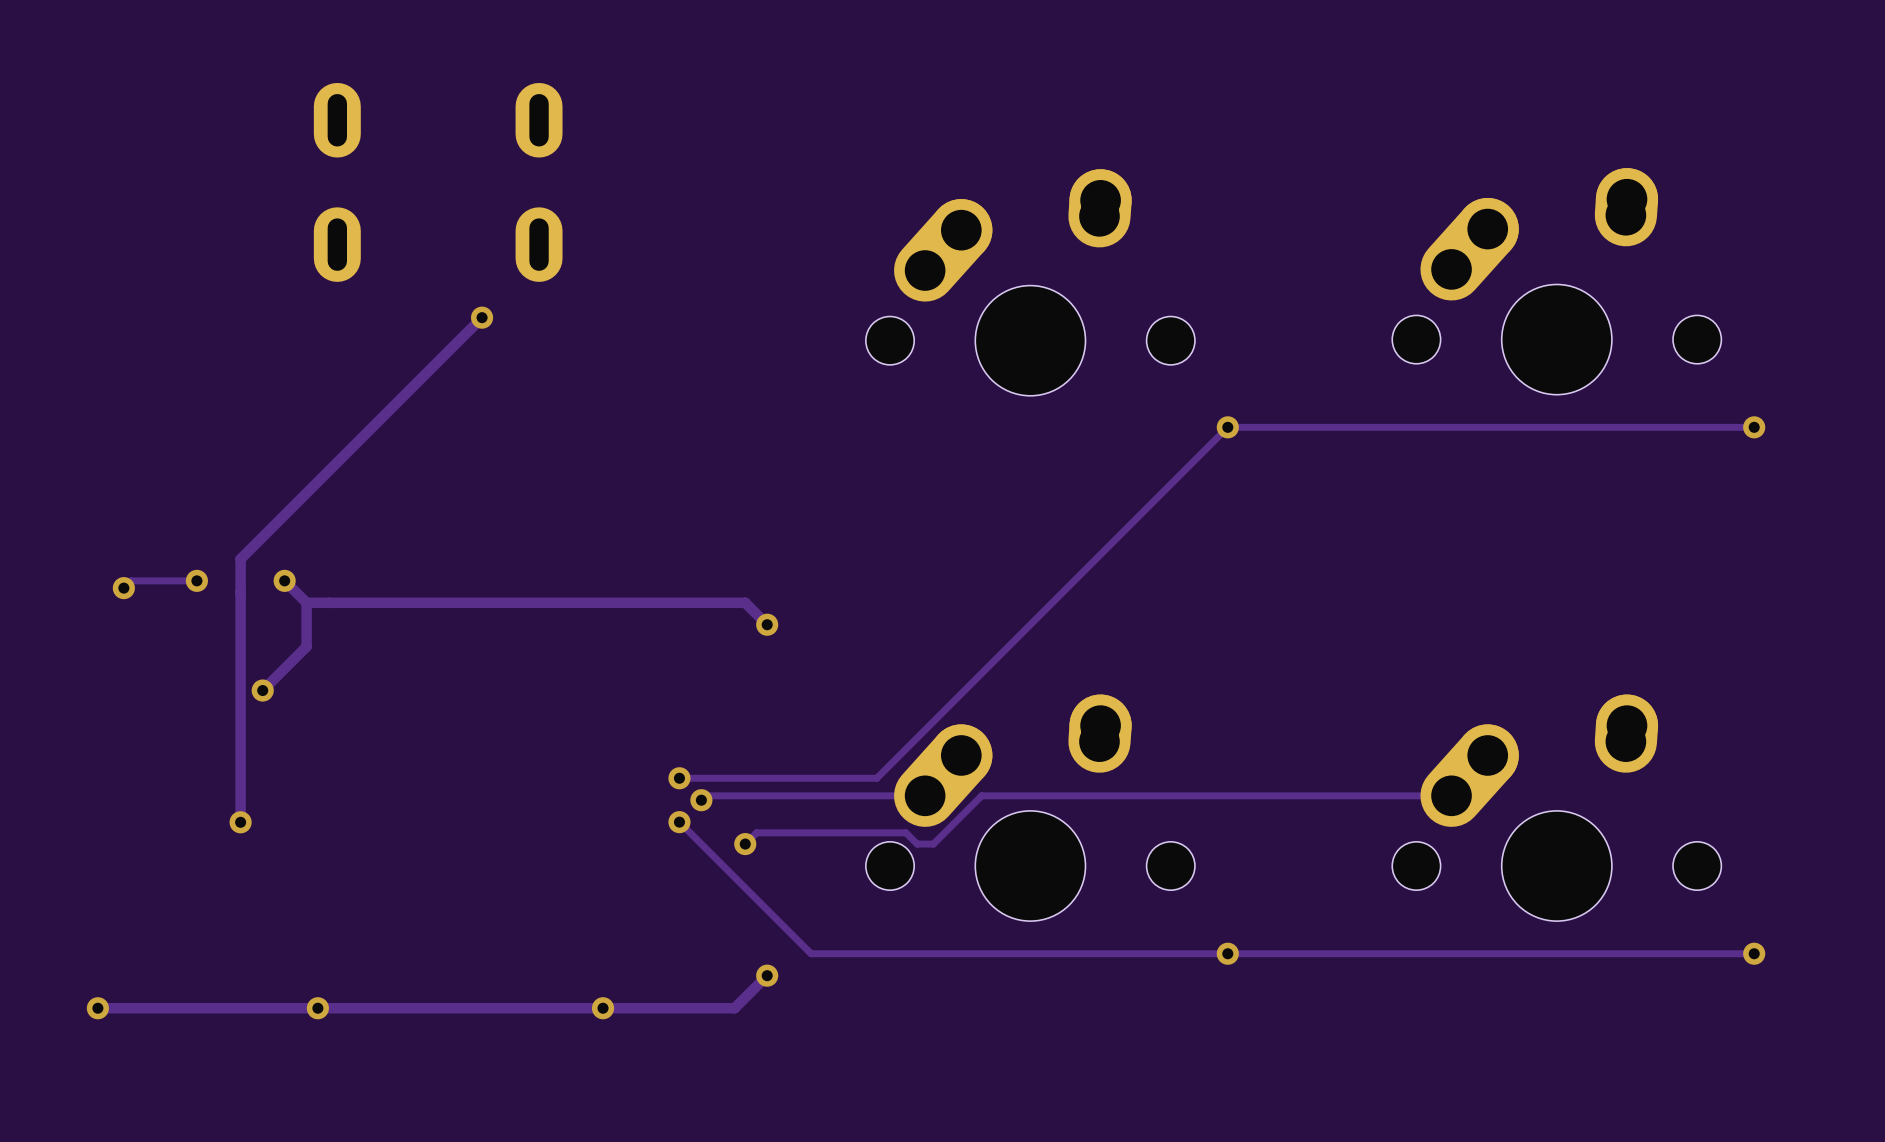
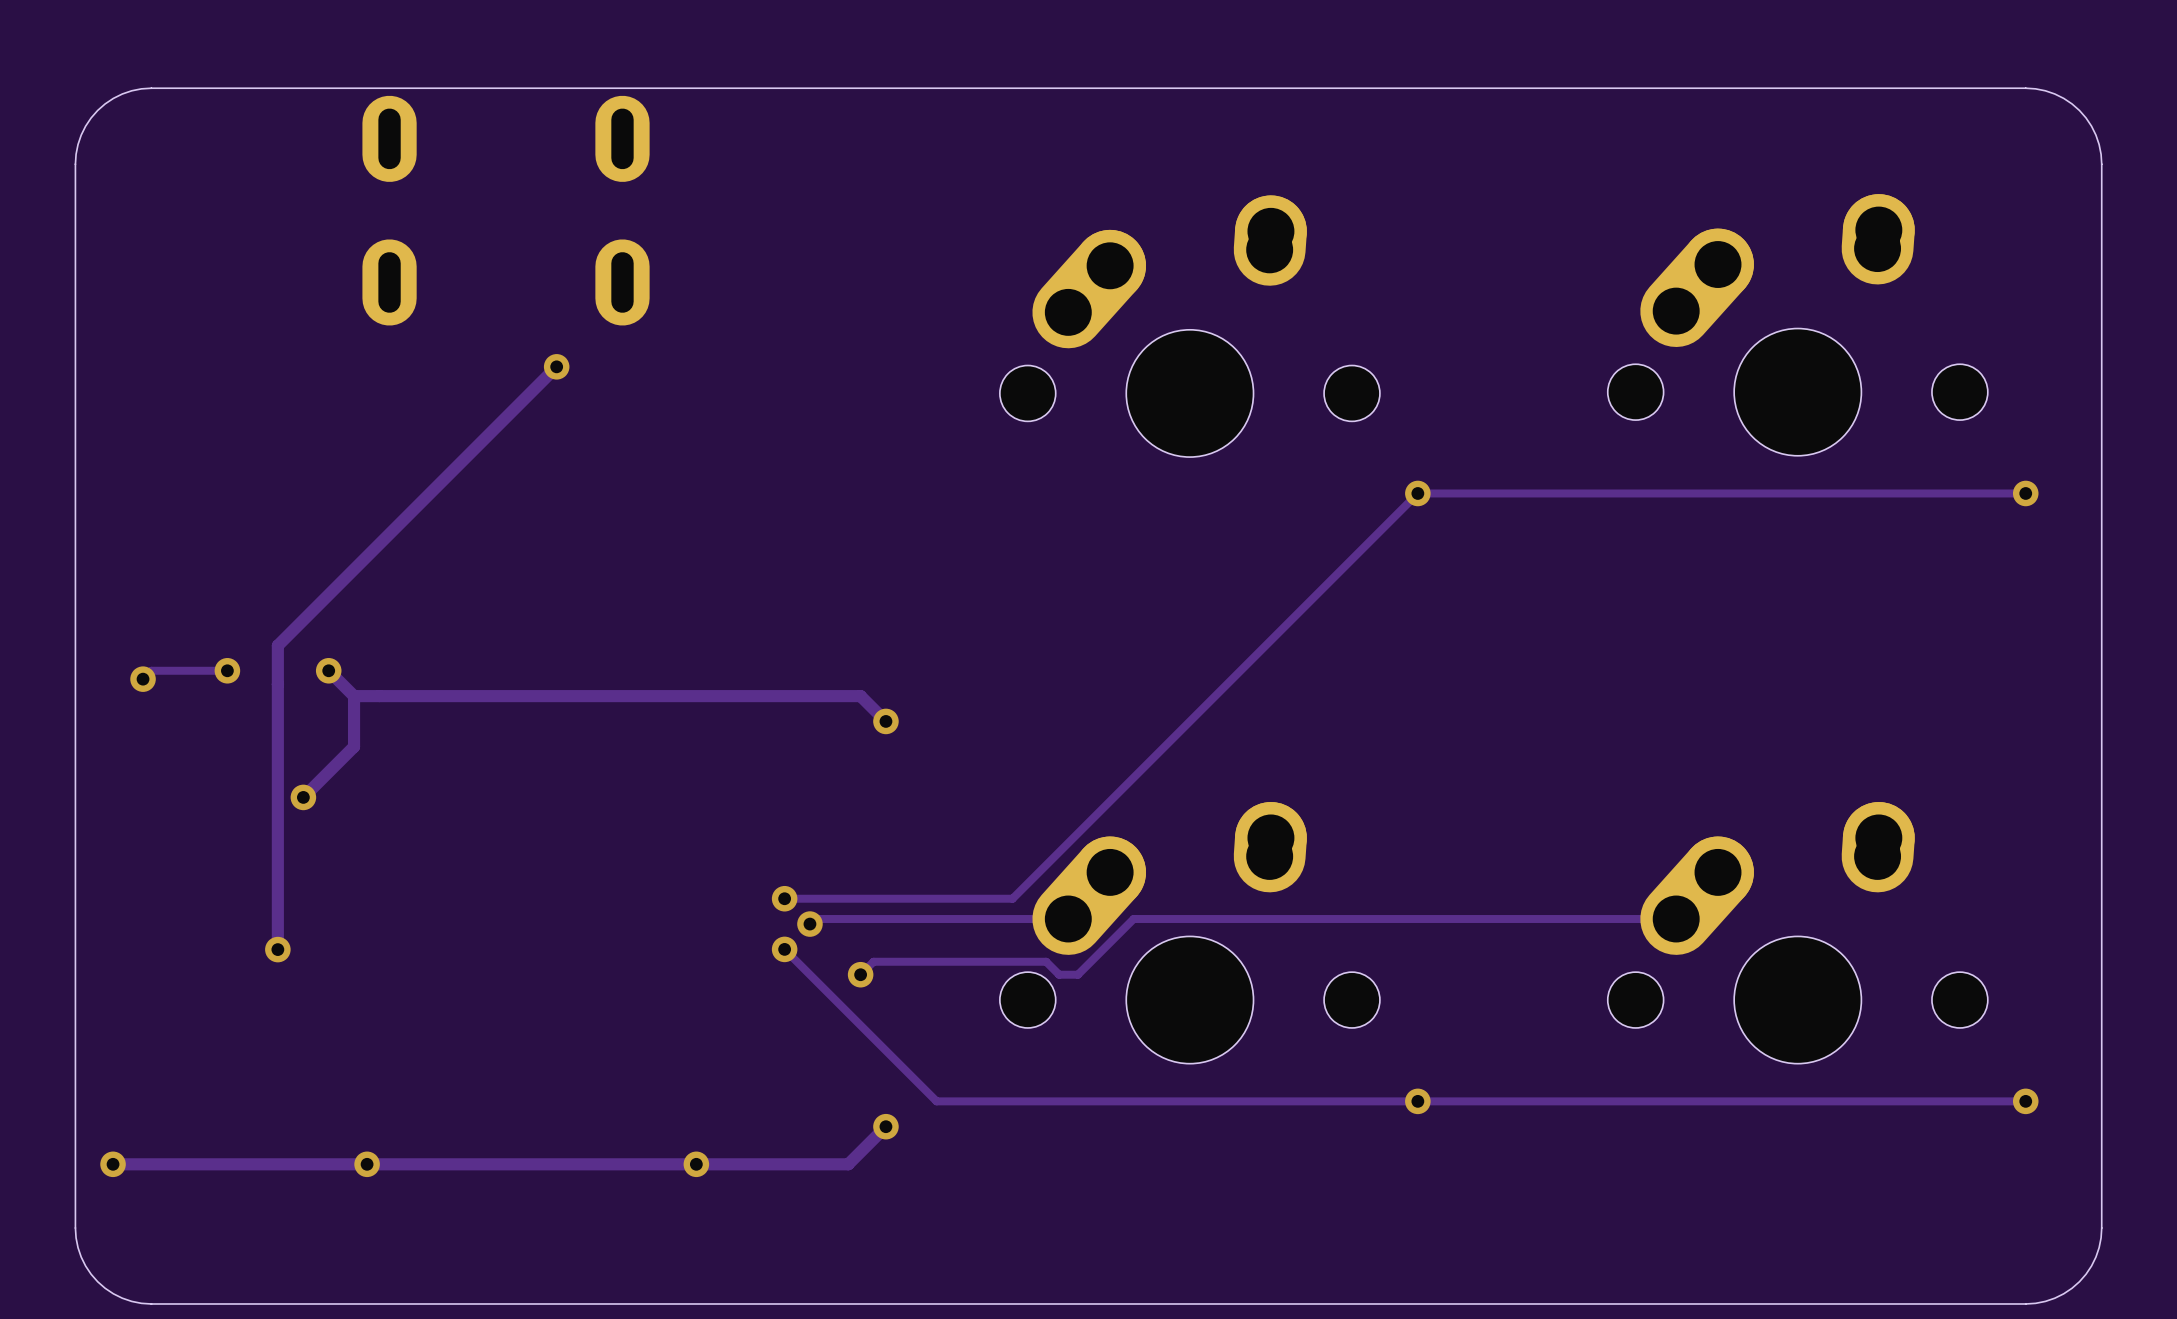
board edge: none -> (151, 88) (2025, 88) (2045, 90) (2063, 98) (2079, 110) (2091, 126) (2099, 144) (2101, 164) (2101, 1228) (2099, 1247) (2091, 1266) (2079, 1281) (2063, 1293) (2045, 1301) (2025, 1303) (151, 1303) (131, 1301) (113, 1293) (97, 1281) (85, 1266) (78, 1247) (75, 1228) (75, 164) (81, 135) (97, 110) (122, 94) (151, 88)

